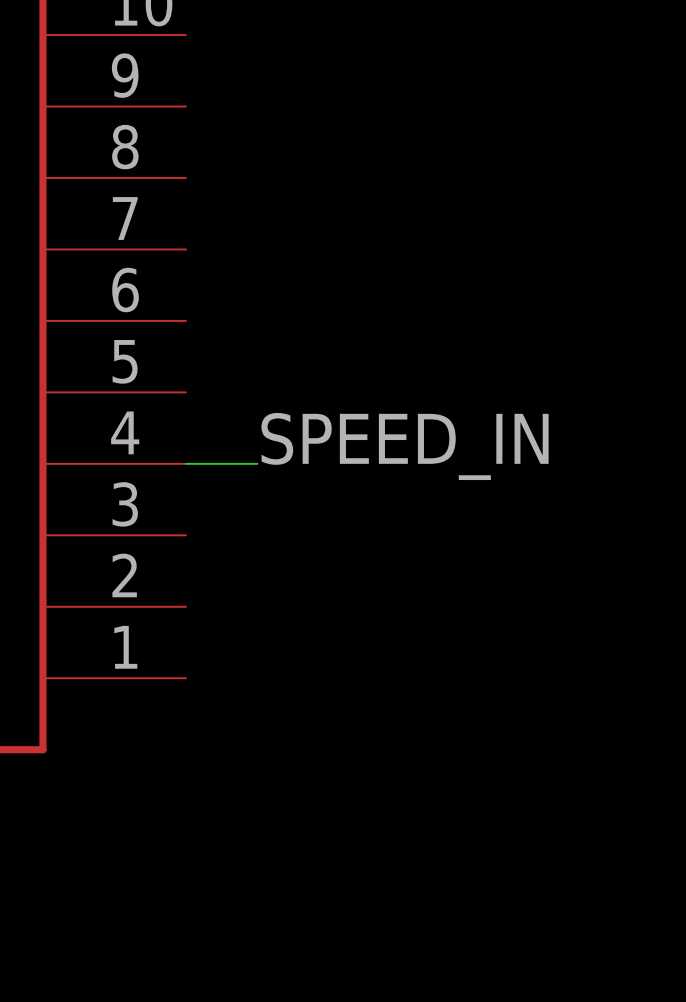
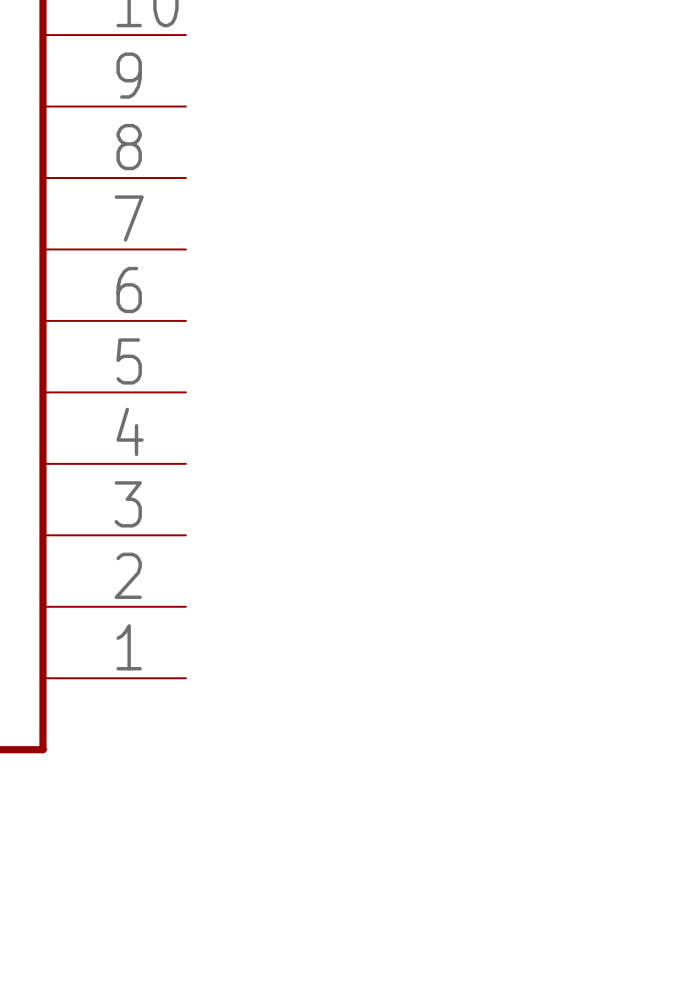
label: SPEED_IN (405, 446) -> none
wire: (185, 463) (257, 463) -> none

